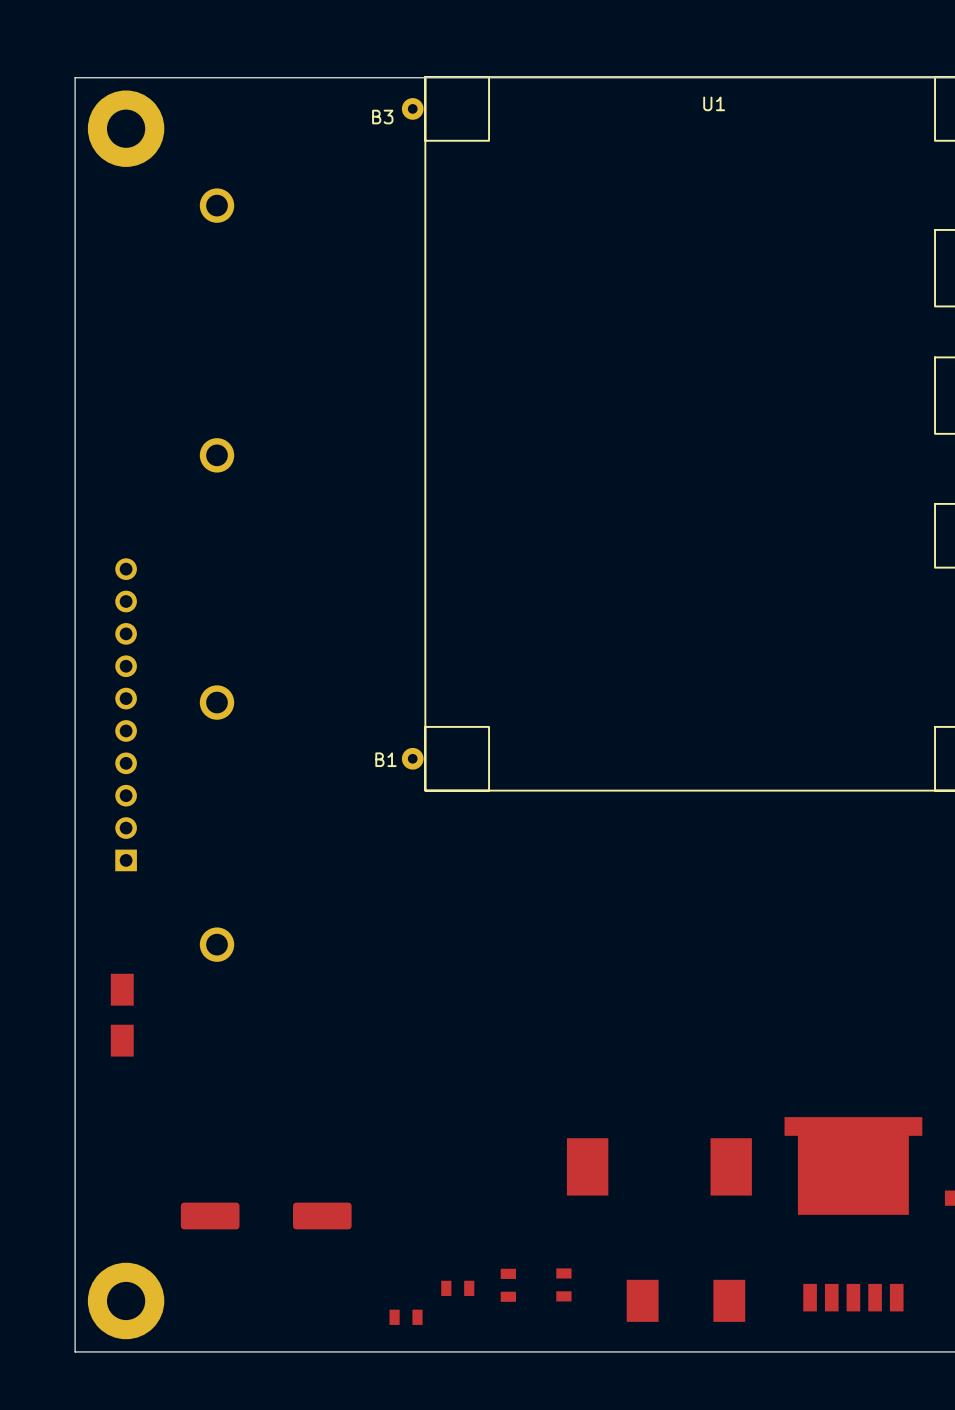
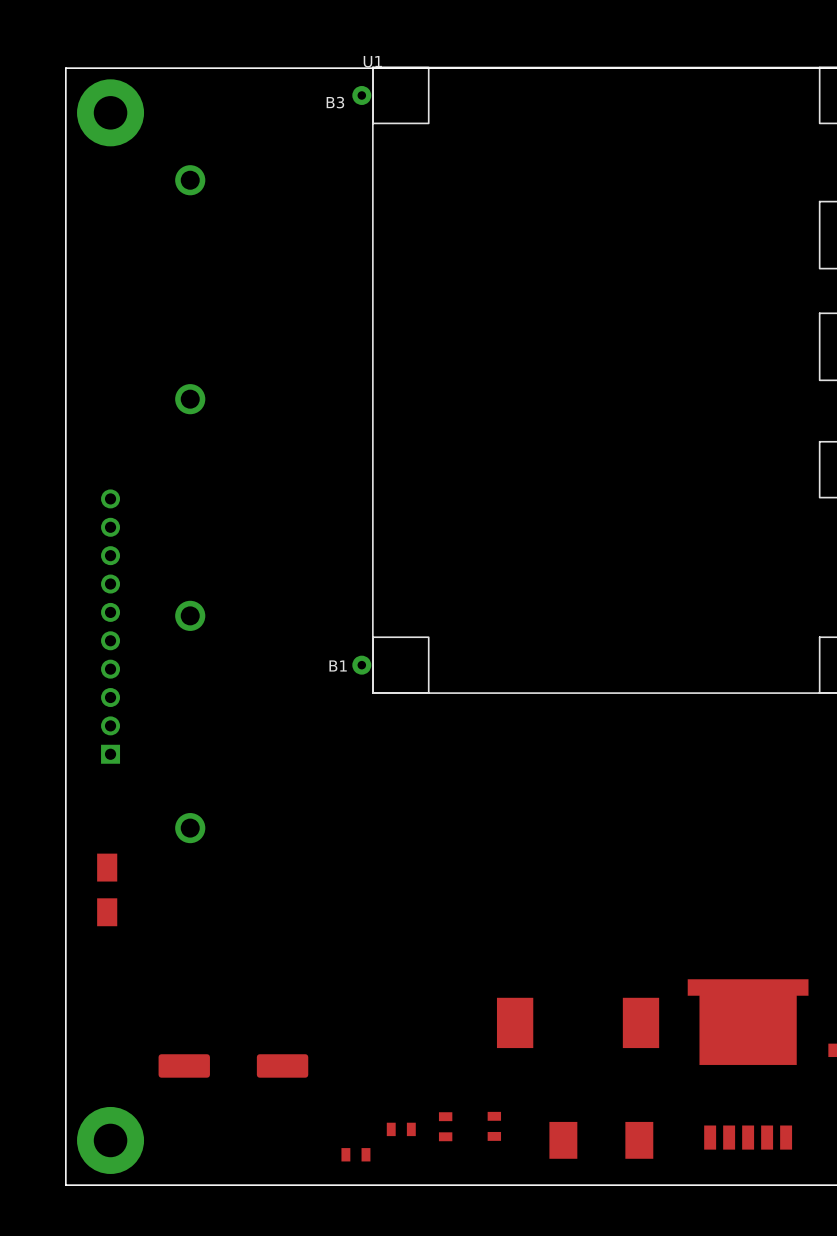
U1 name position: U1 (714, 103) -> U1 (372, 61)

